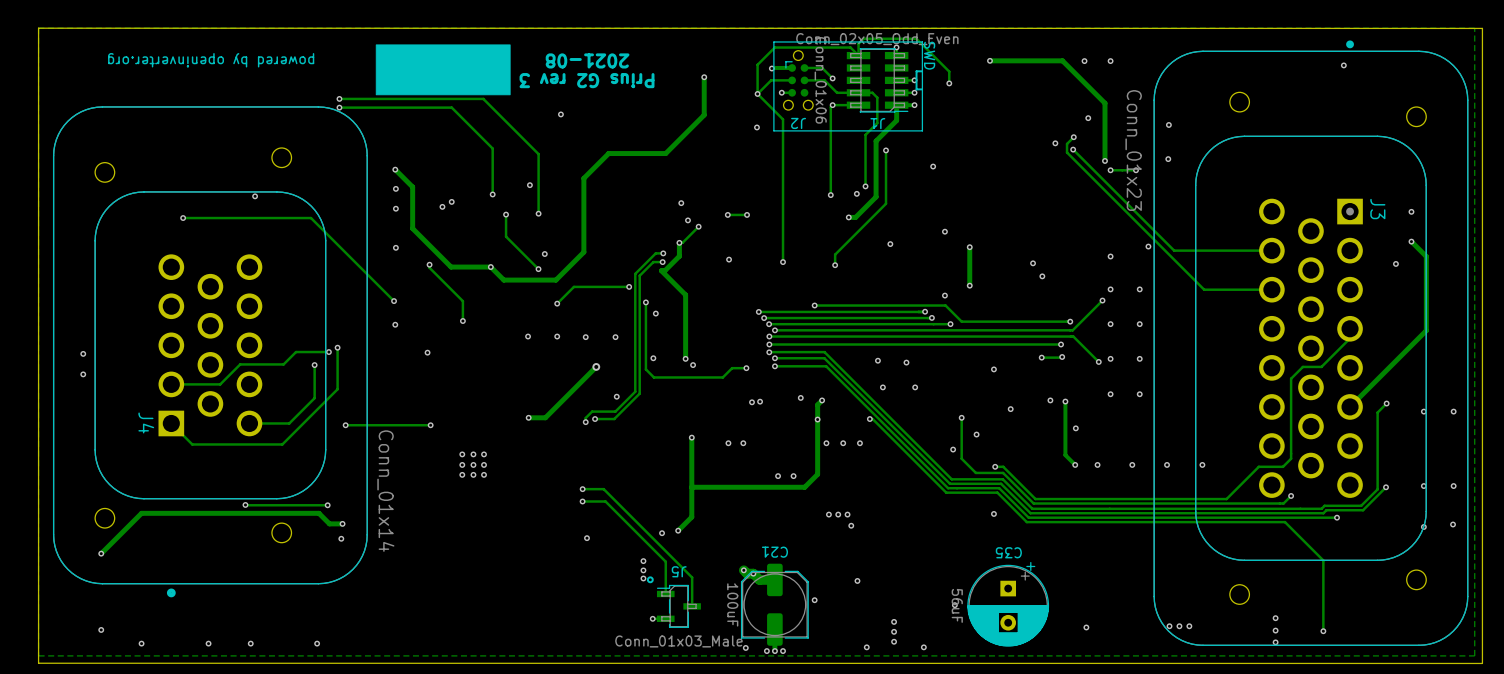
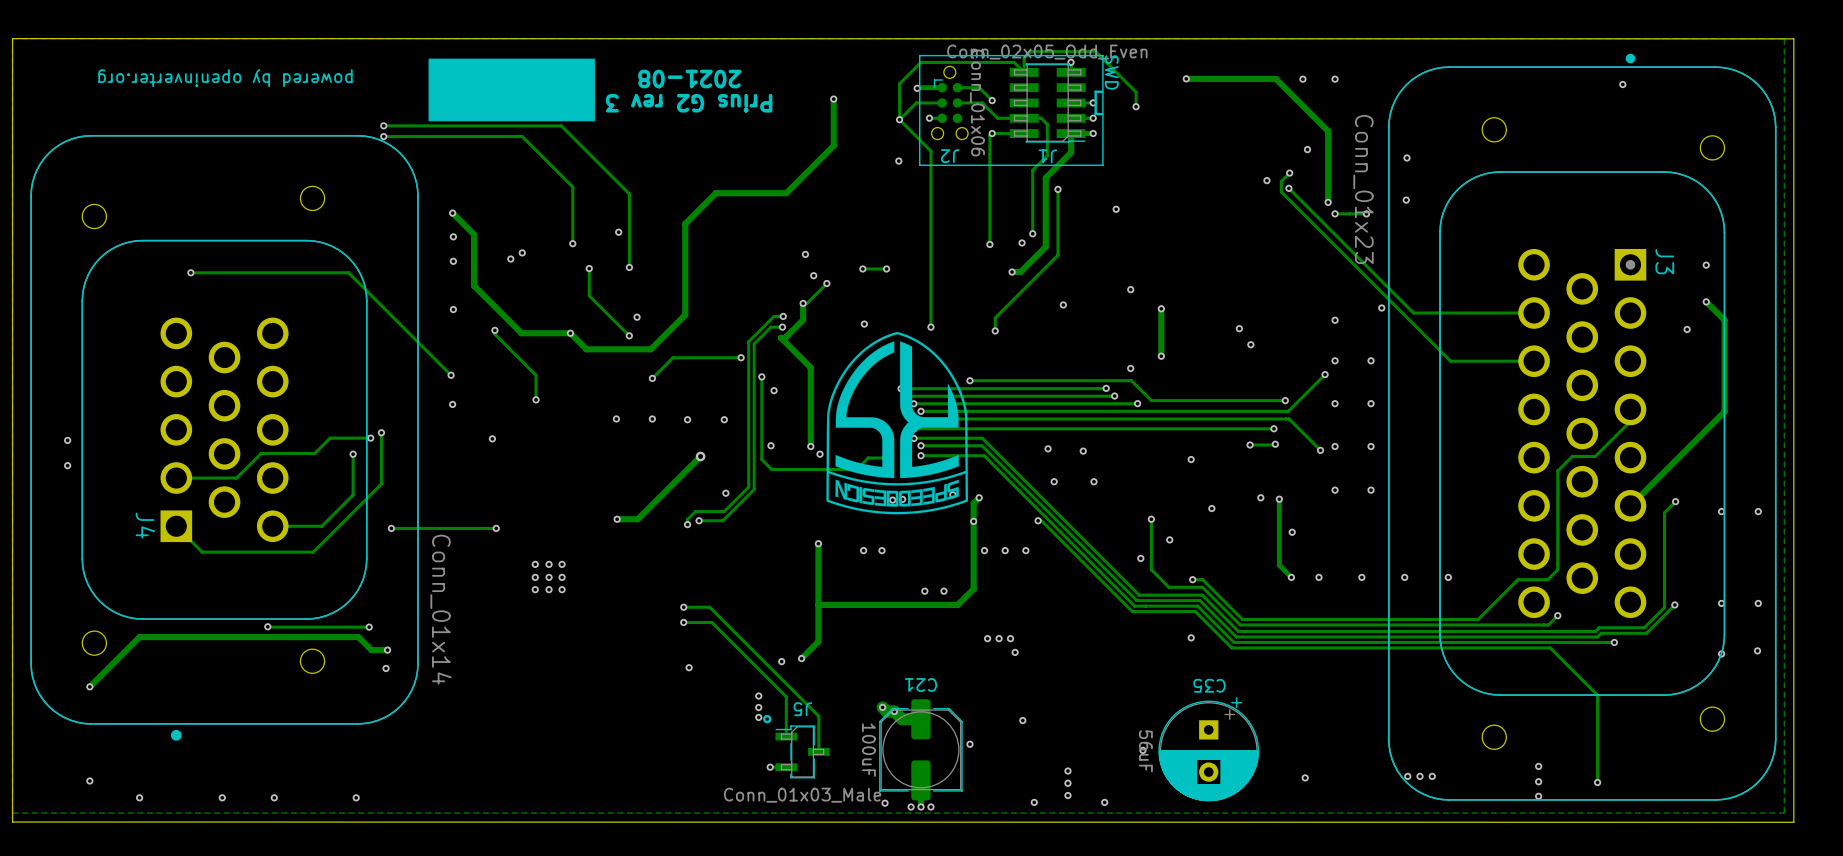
via: (560, 114) -> none
via: (255, 196) -> none
drawing: none -> [826, 331, 969, 515]

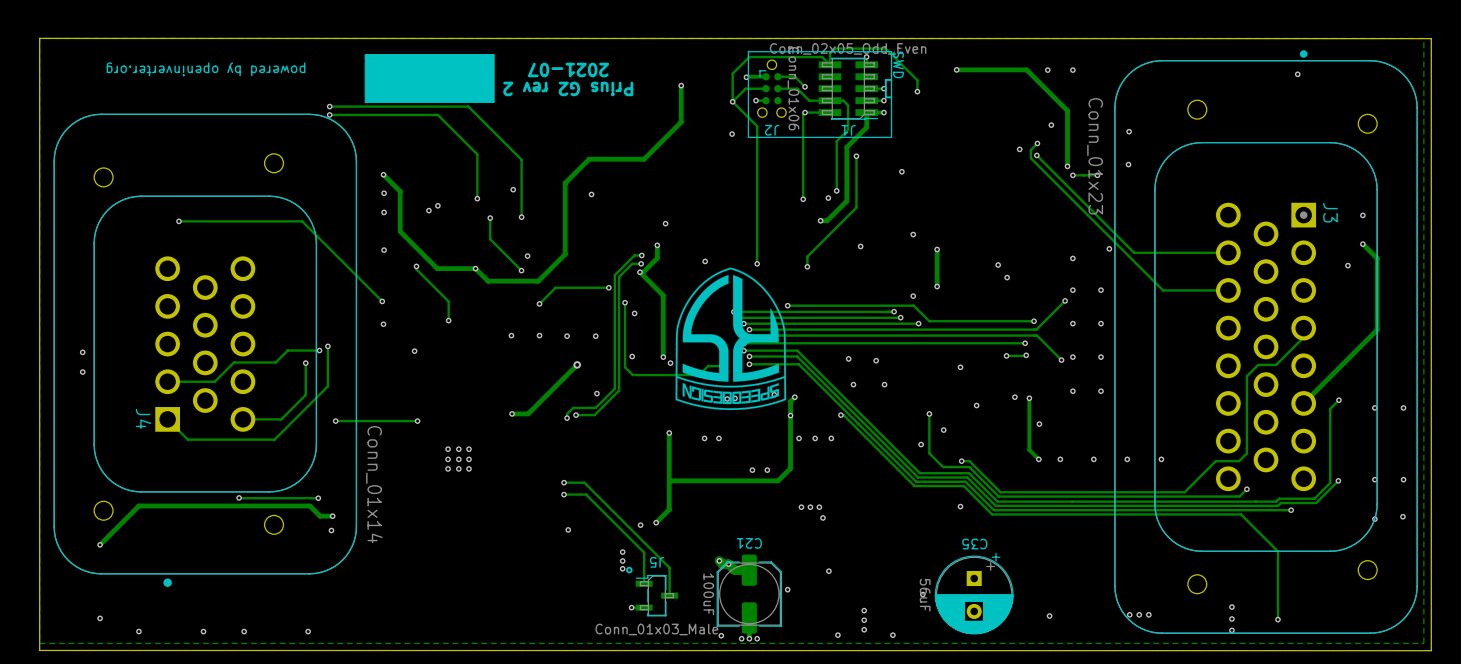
text: 2021-08 (689, 79) -> 2021-07 (568, 69)
text: Prius G2 rev 3 (689, 103) -> Prius G2 rev 2 (568, 88)
via: none -> (591, 194)
via: (805, 254) -> none
via: (862, 268) -> none
track: (886, 268) (862, 268) -> none
via: (886, 268) -> none
track: (826, 283) (806, 303) (803, 303) -> none
via: (826, 283) -> none
via: none -> (640, 272)

